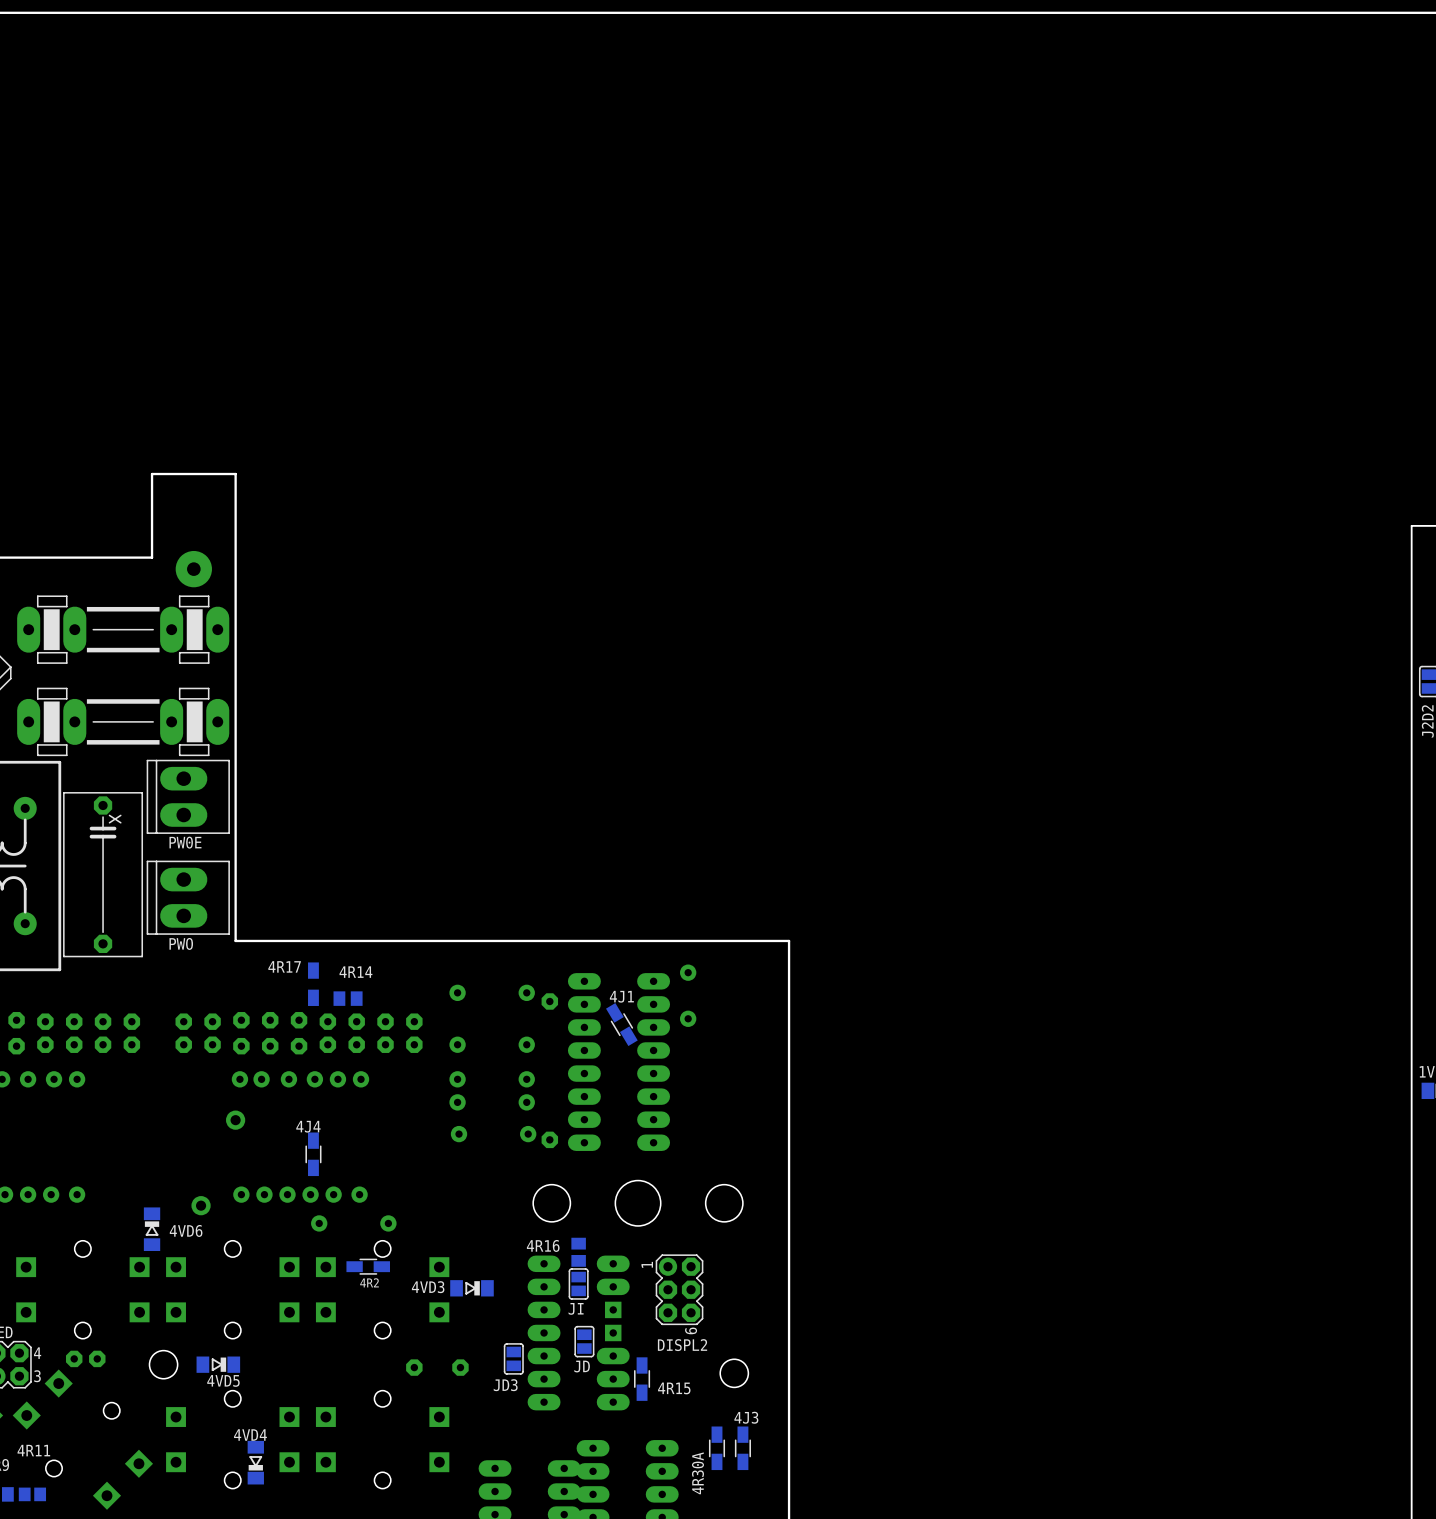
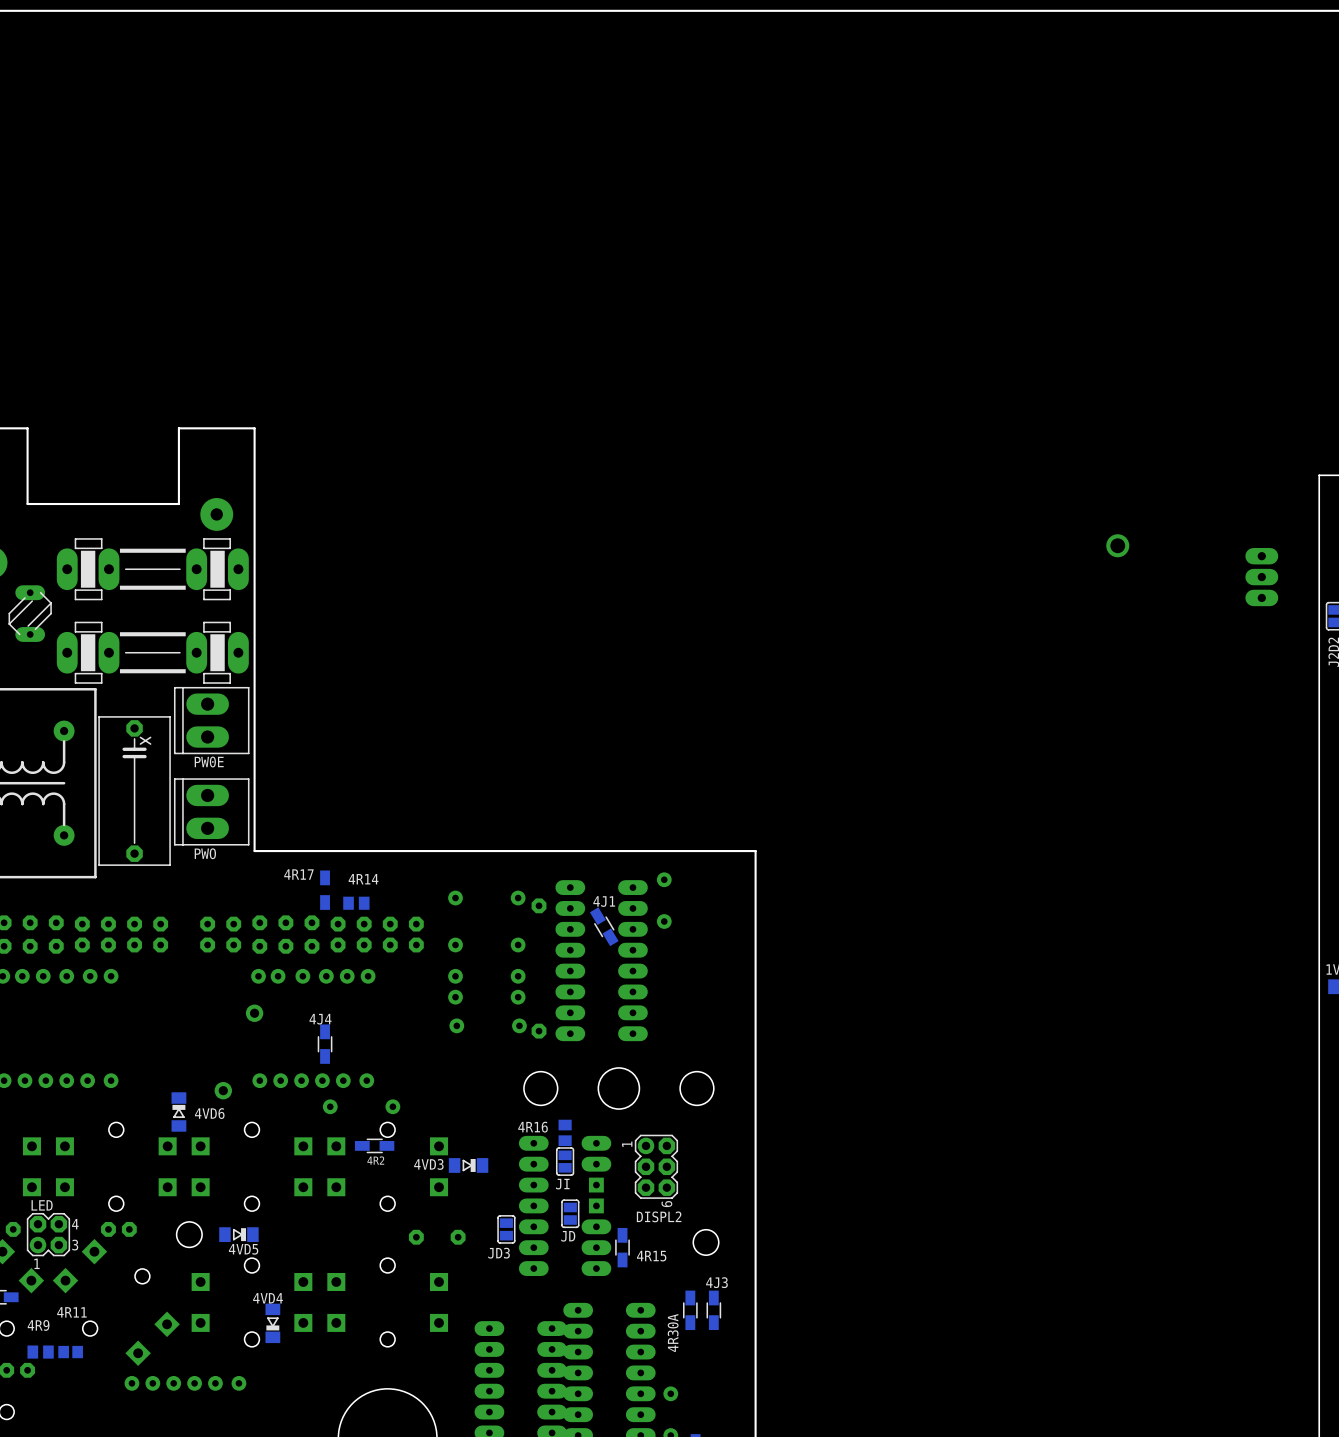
part: none -> (1117, 545)
part: none -> (1261, 577)

